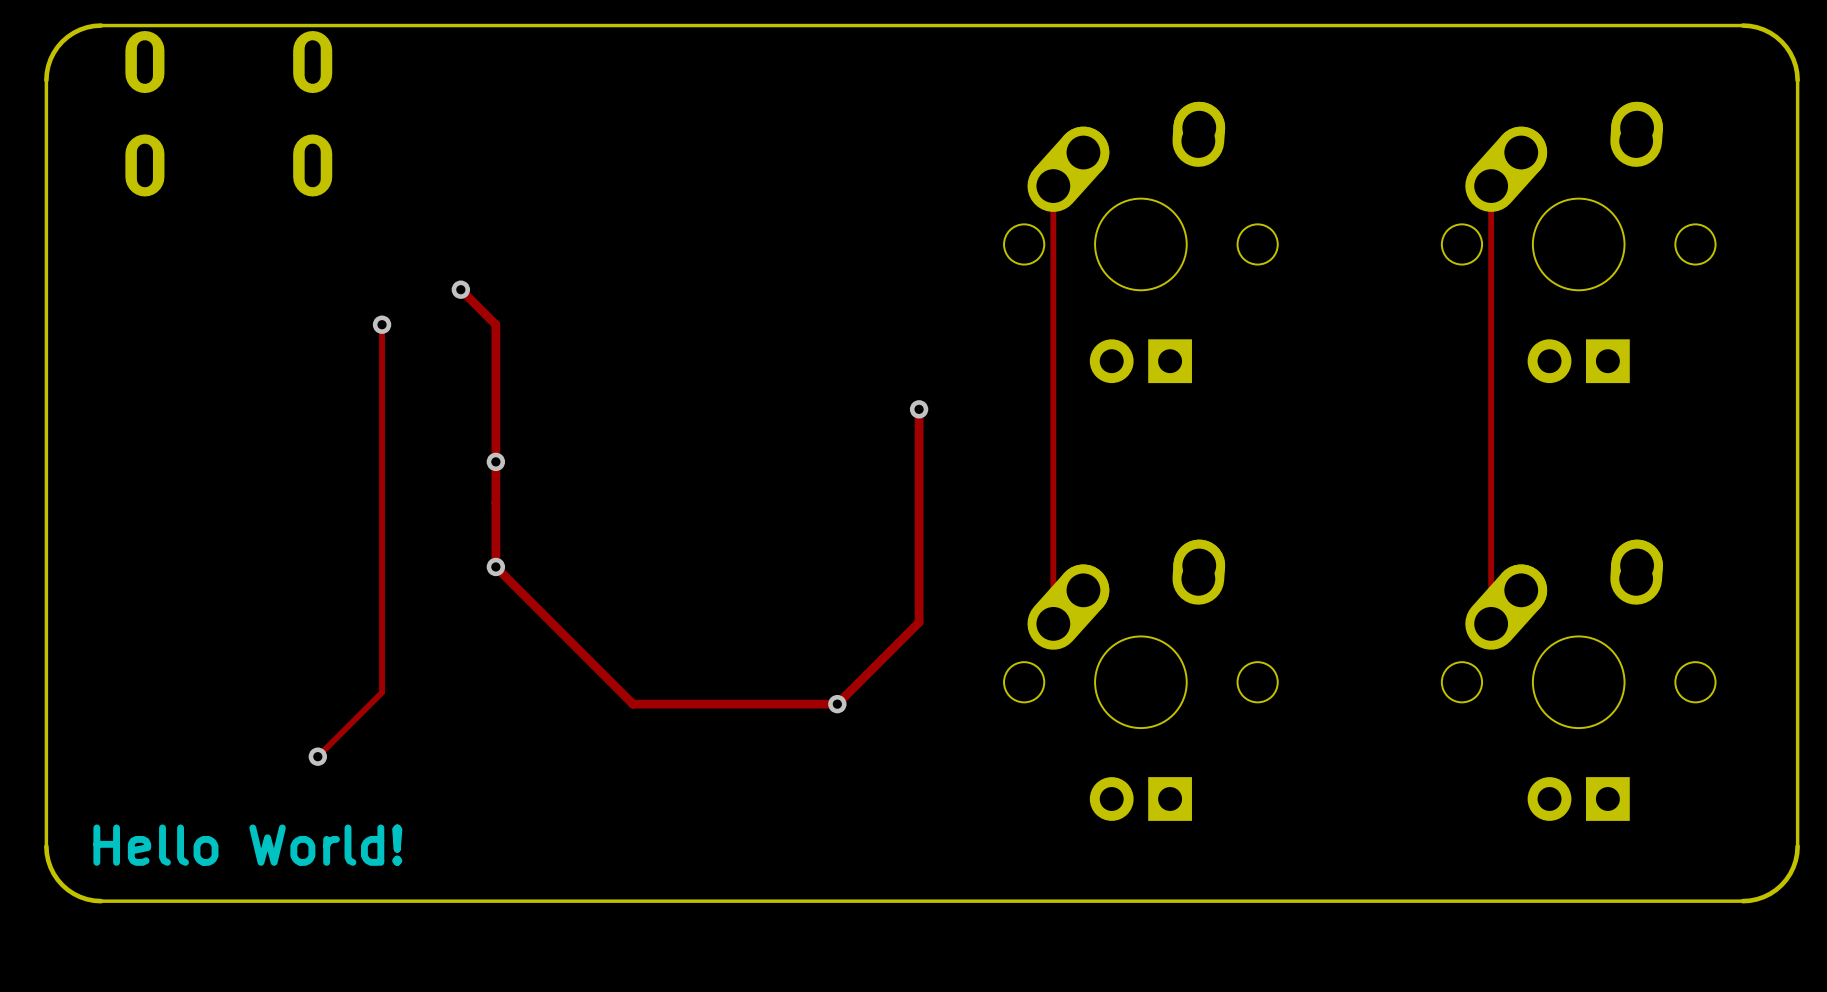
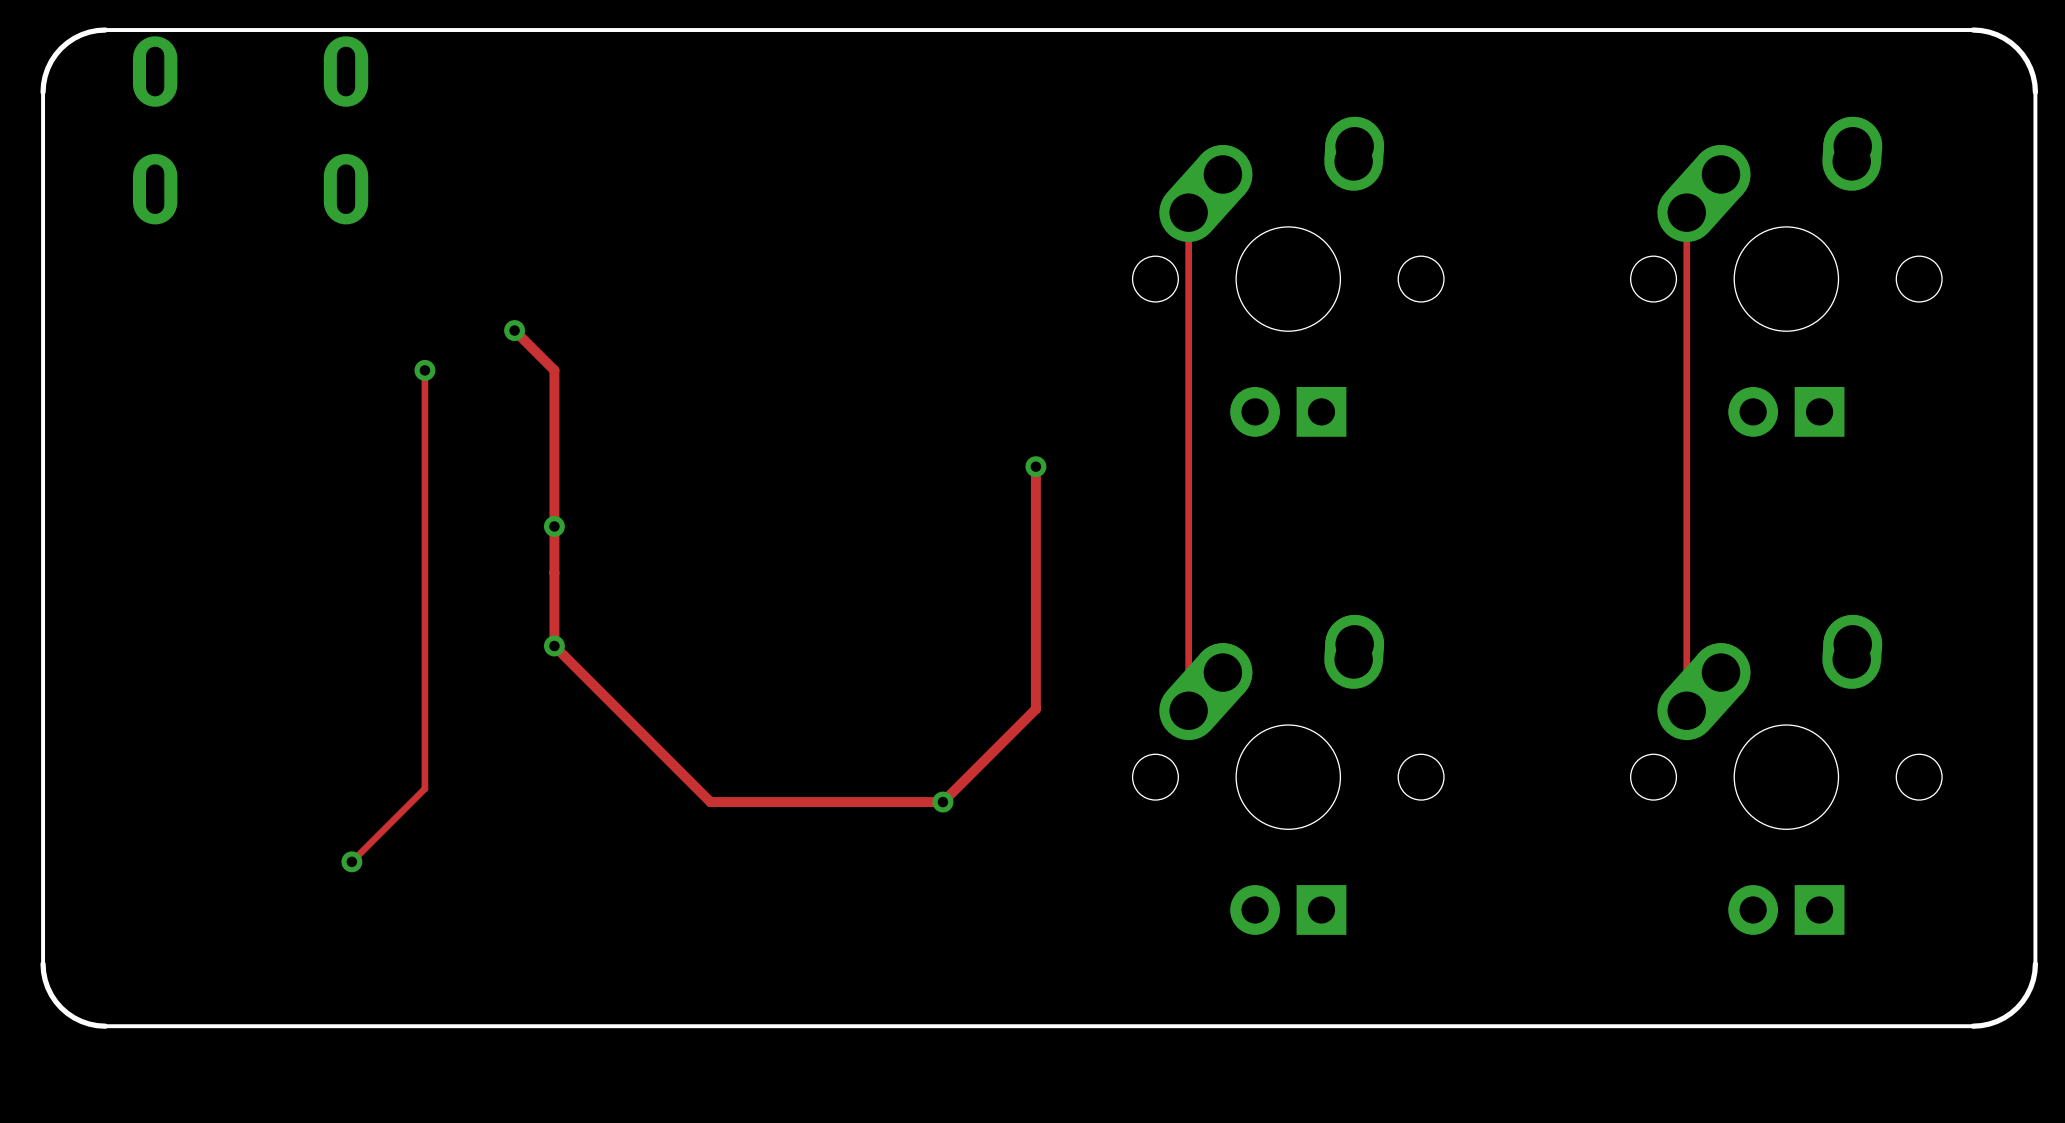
text: Hello World! (247, 845) -> none

